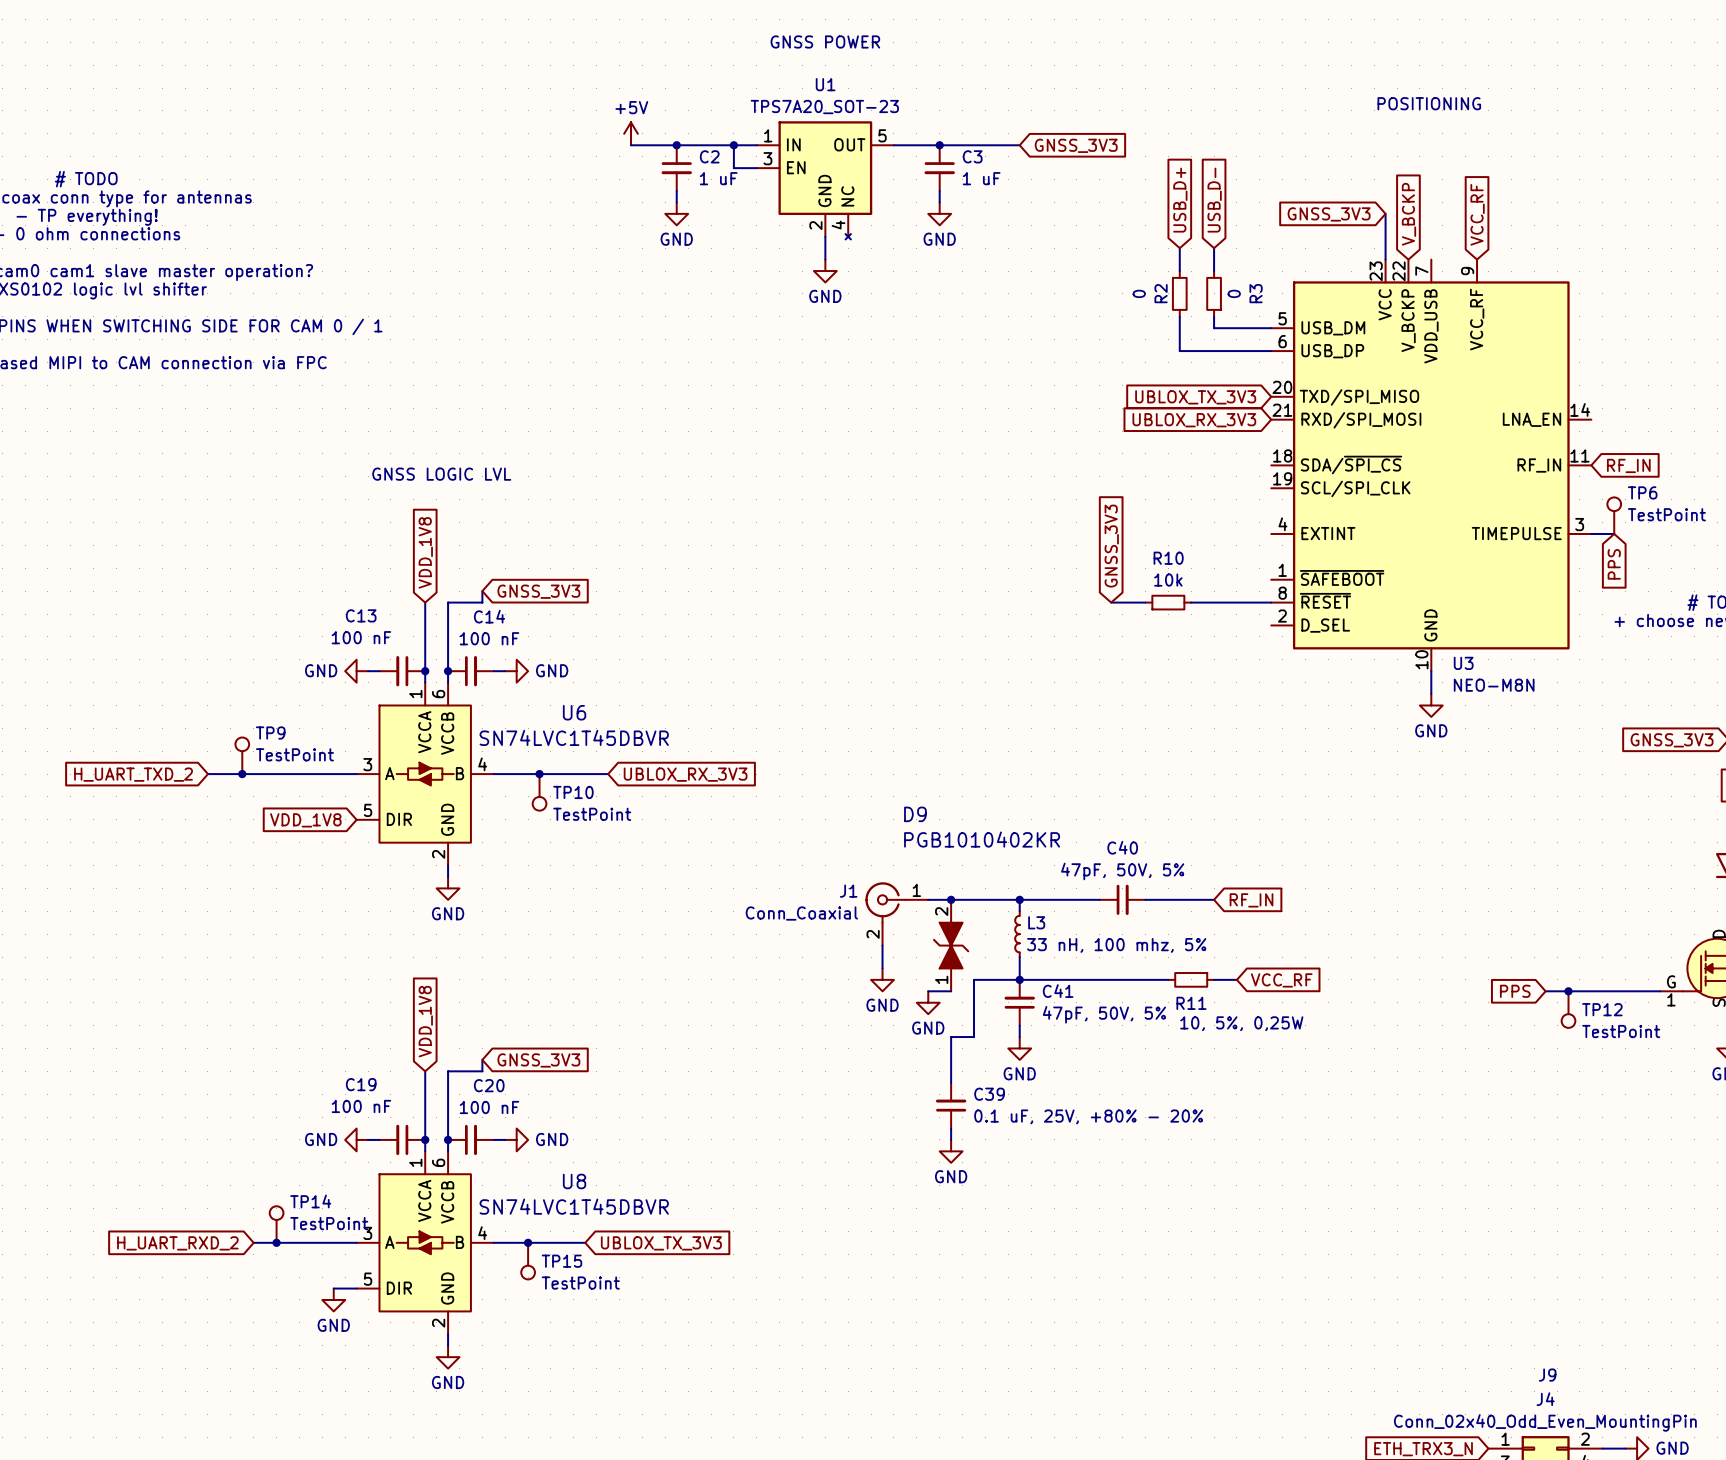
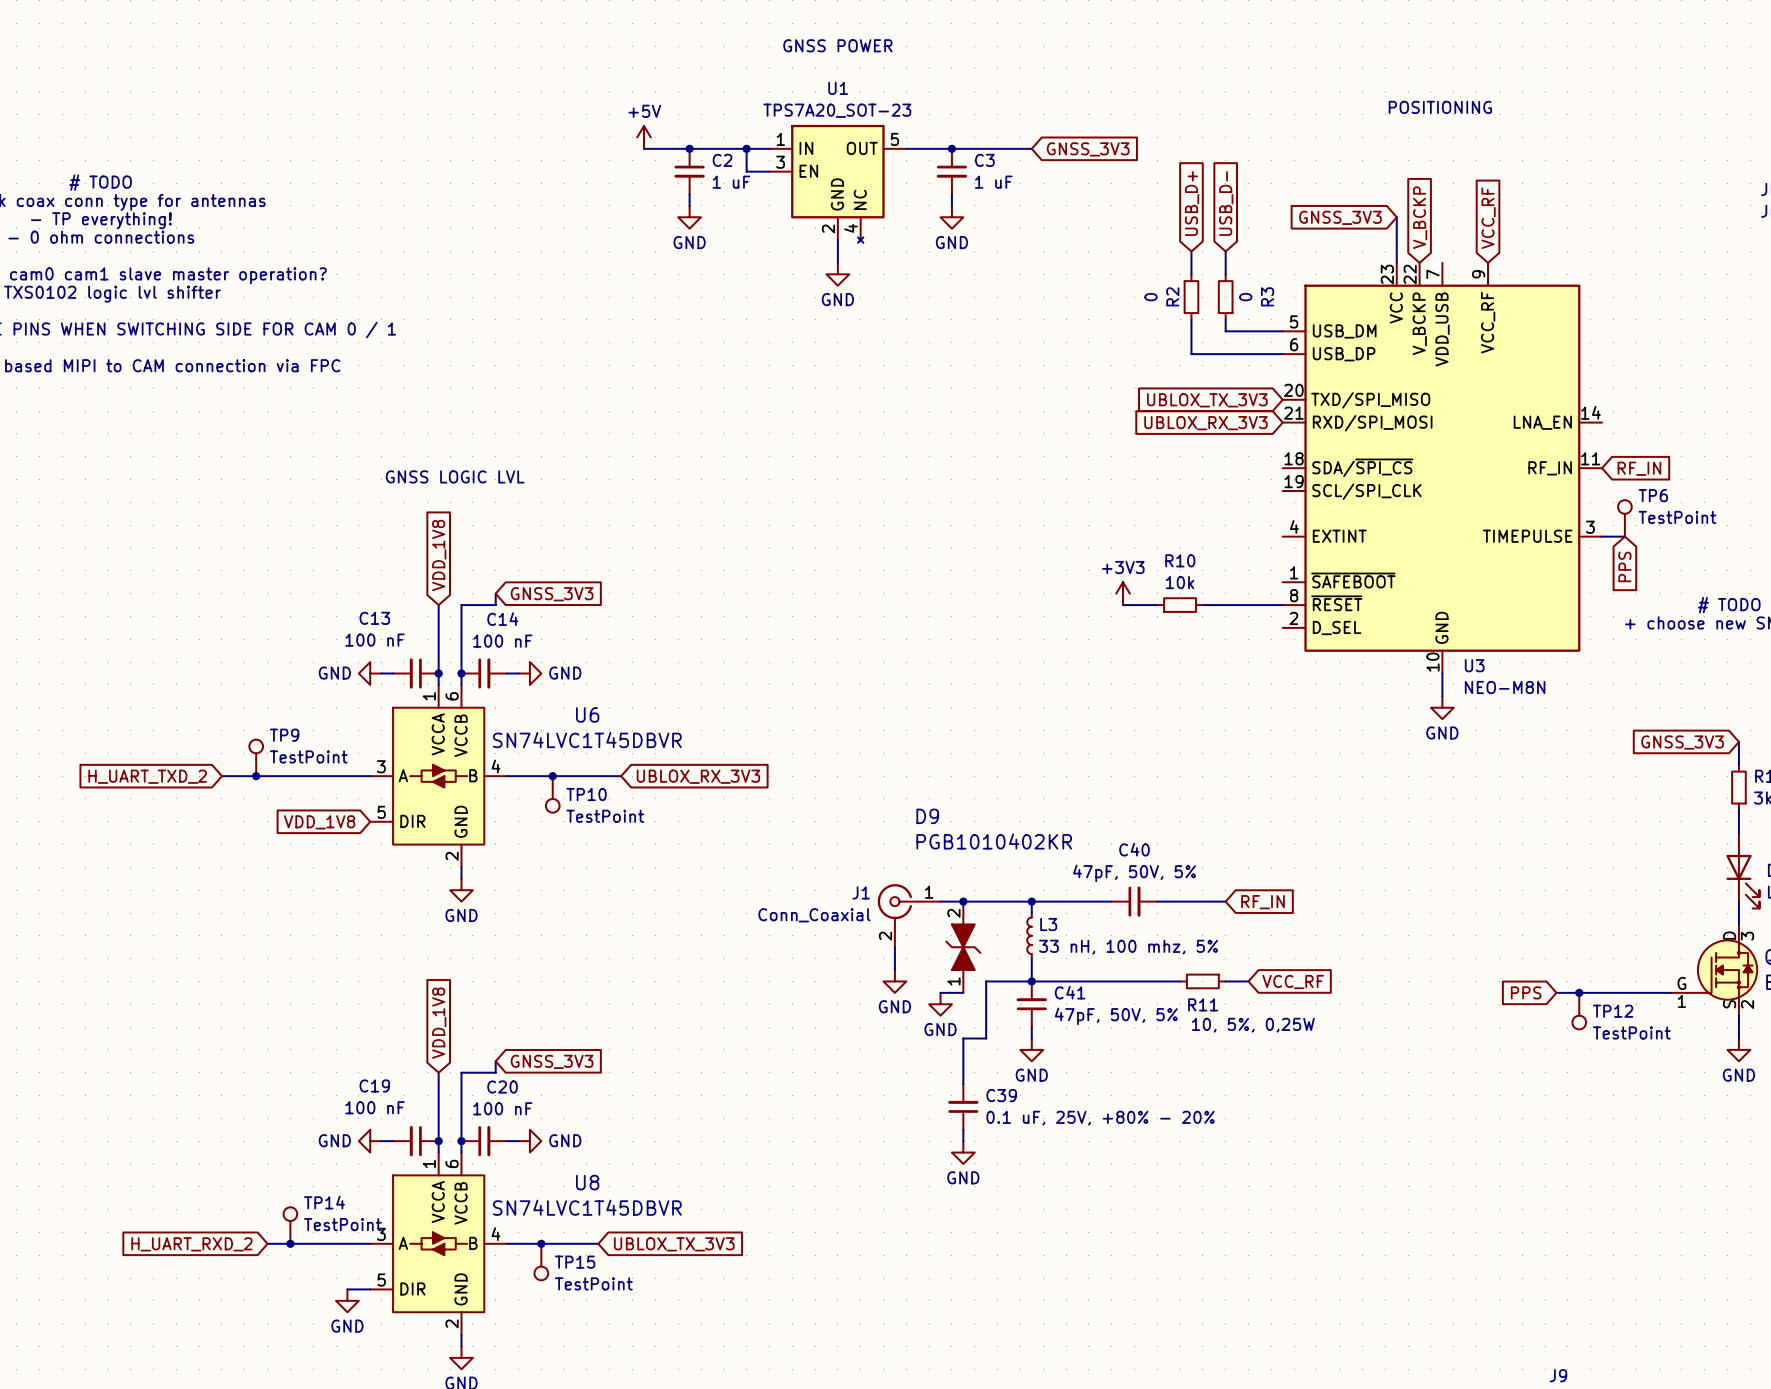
global label: GNSS_3V3 (1111, 546) -> none
power symbol: none -> +3V3 (1123, 593)

